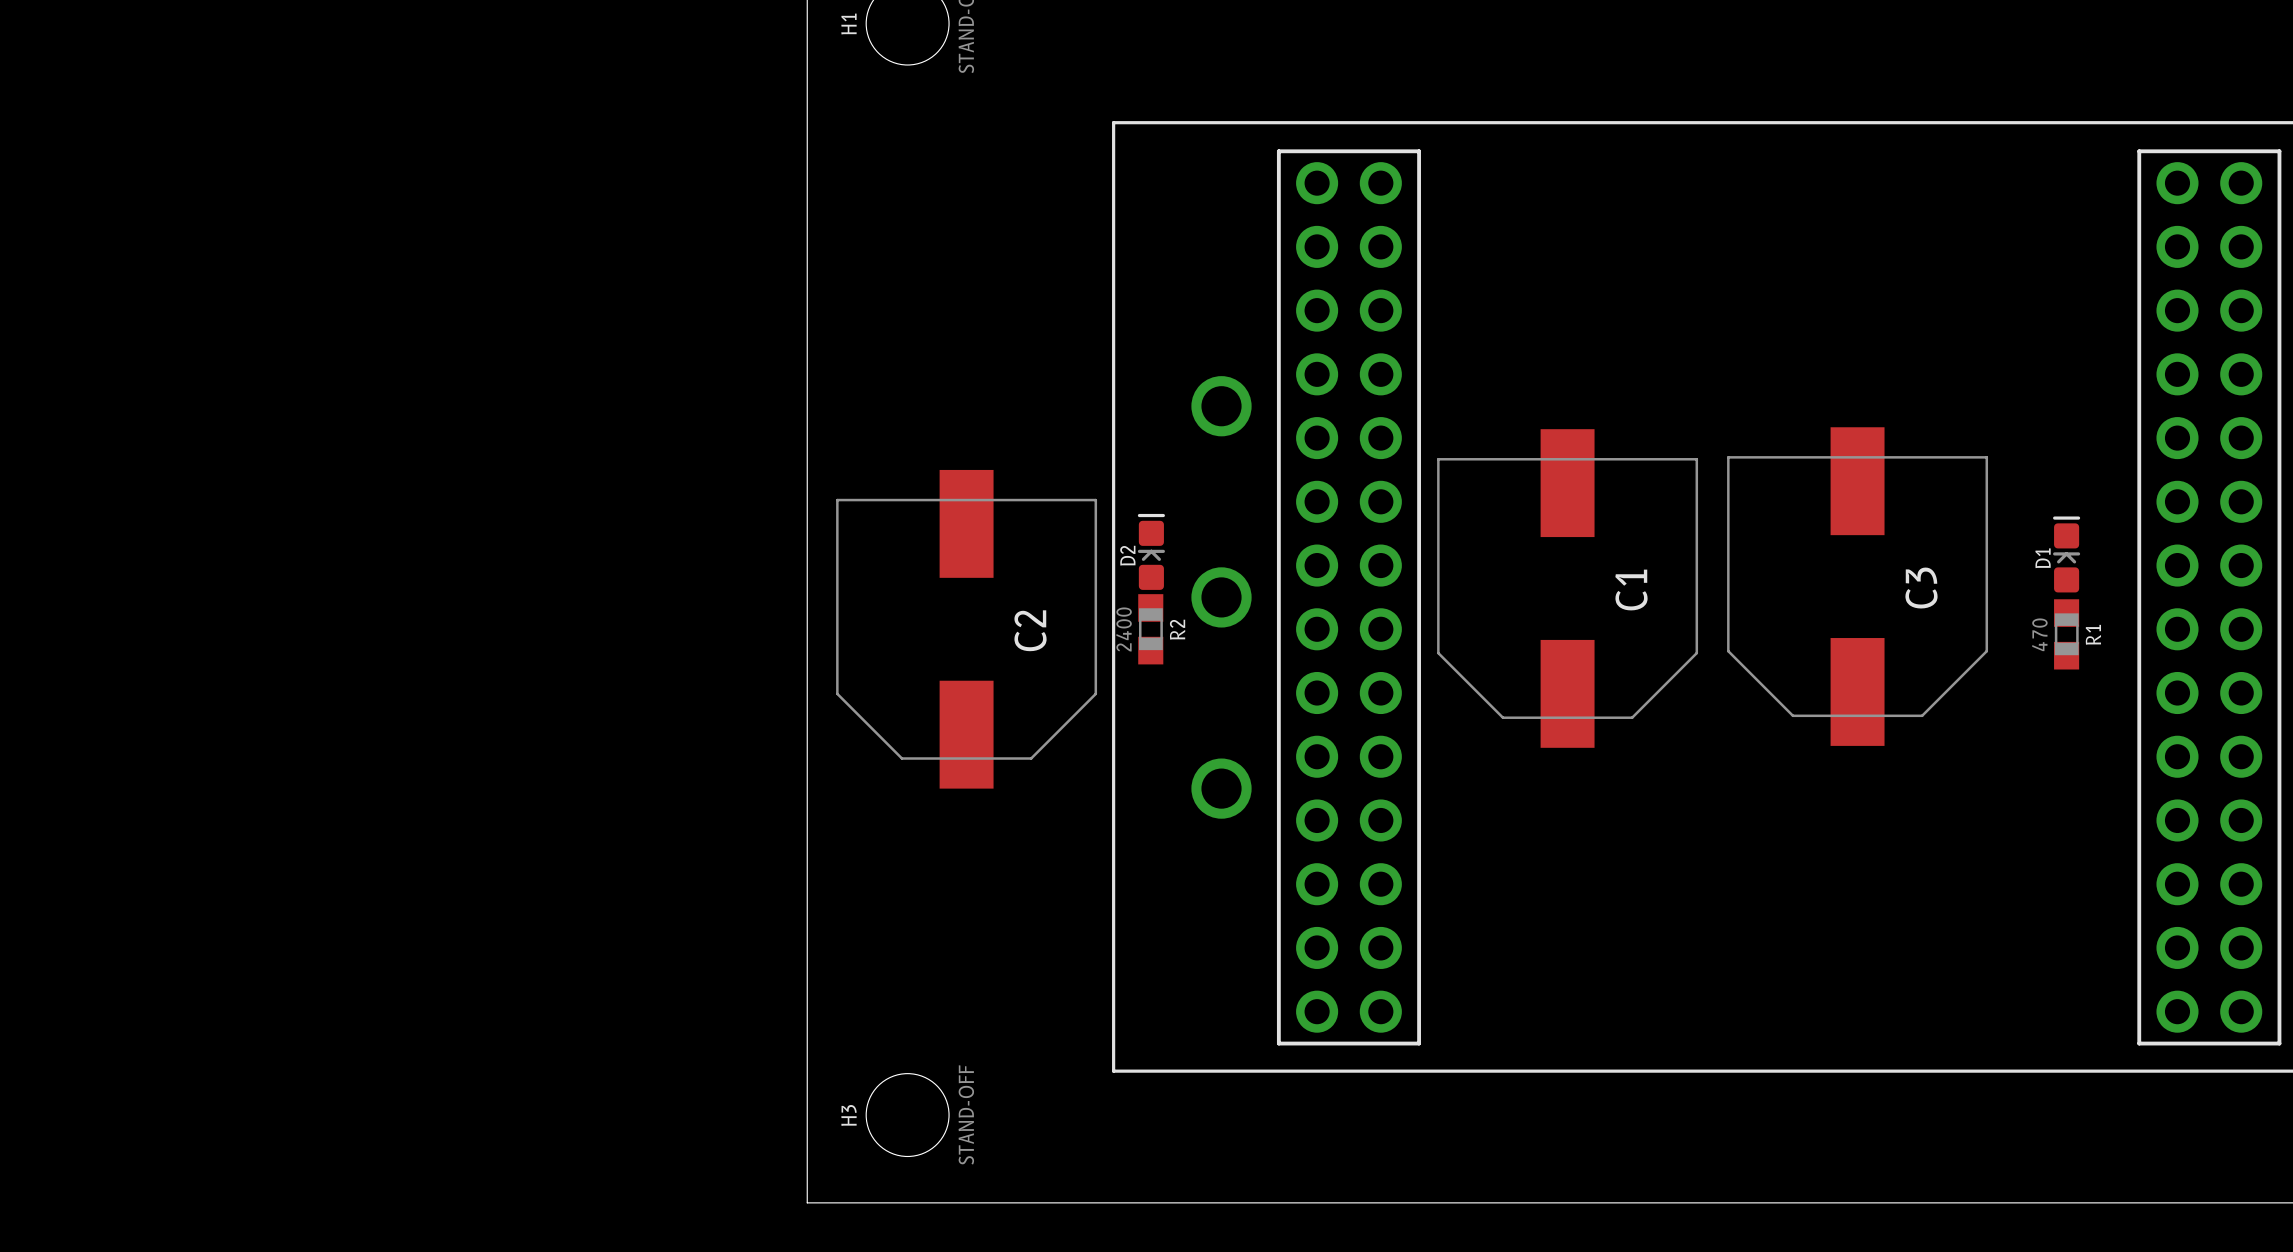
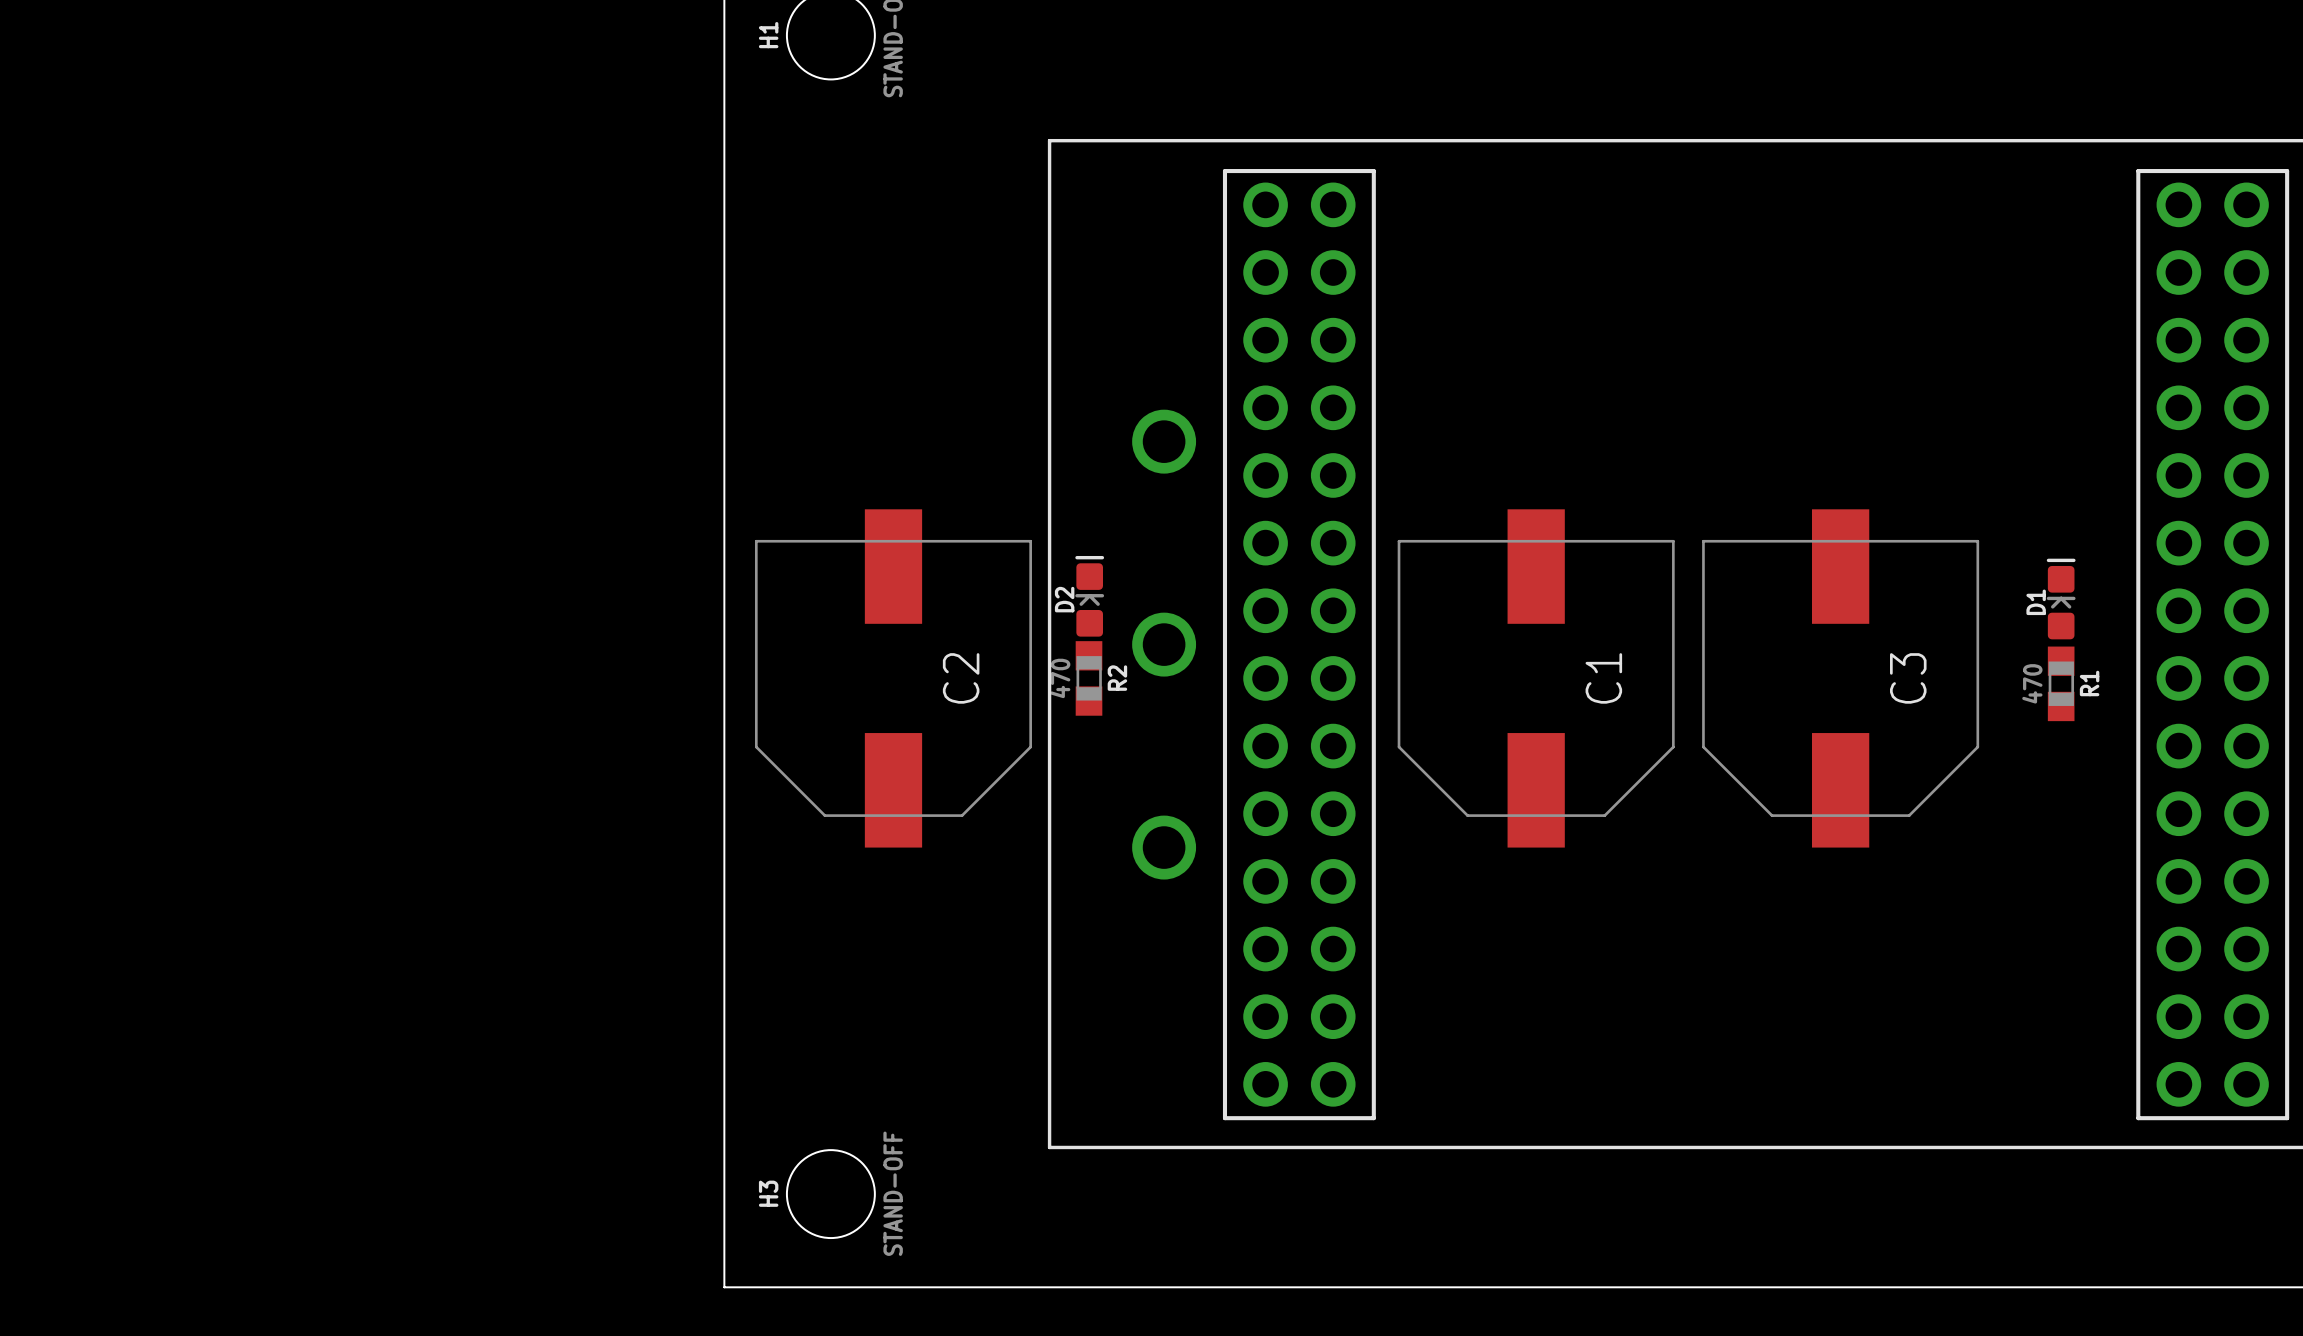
C3 position: (1857, 586) -> (1840, 678)
C1 position: (1567, 588) -> (1536, 678)
R2 value: 2400 (1124, 629) -> 470 (1060, 678)

